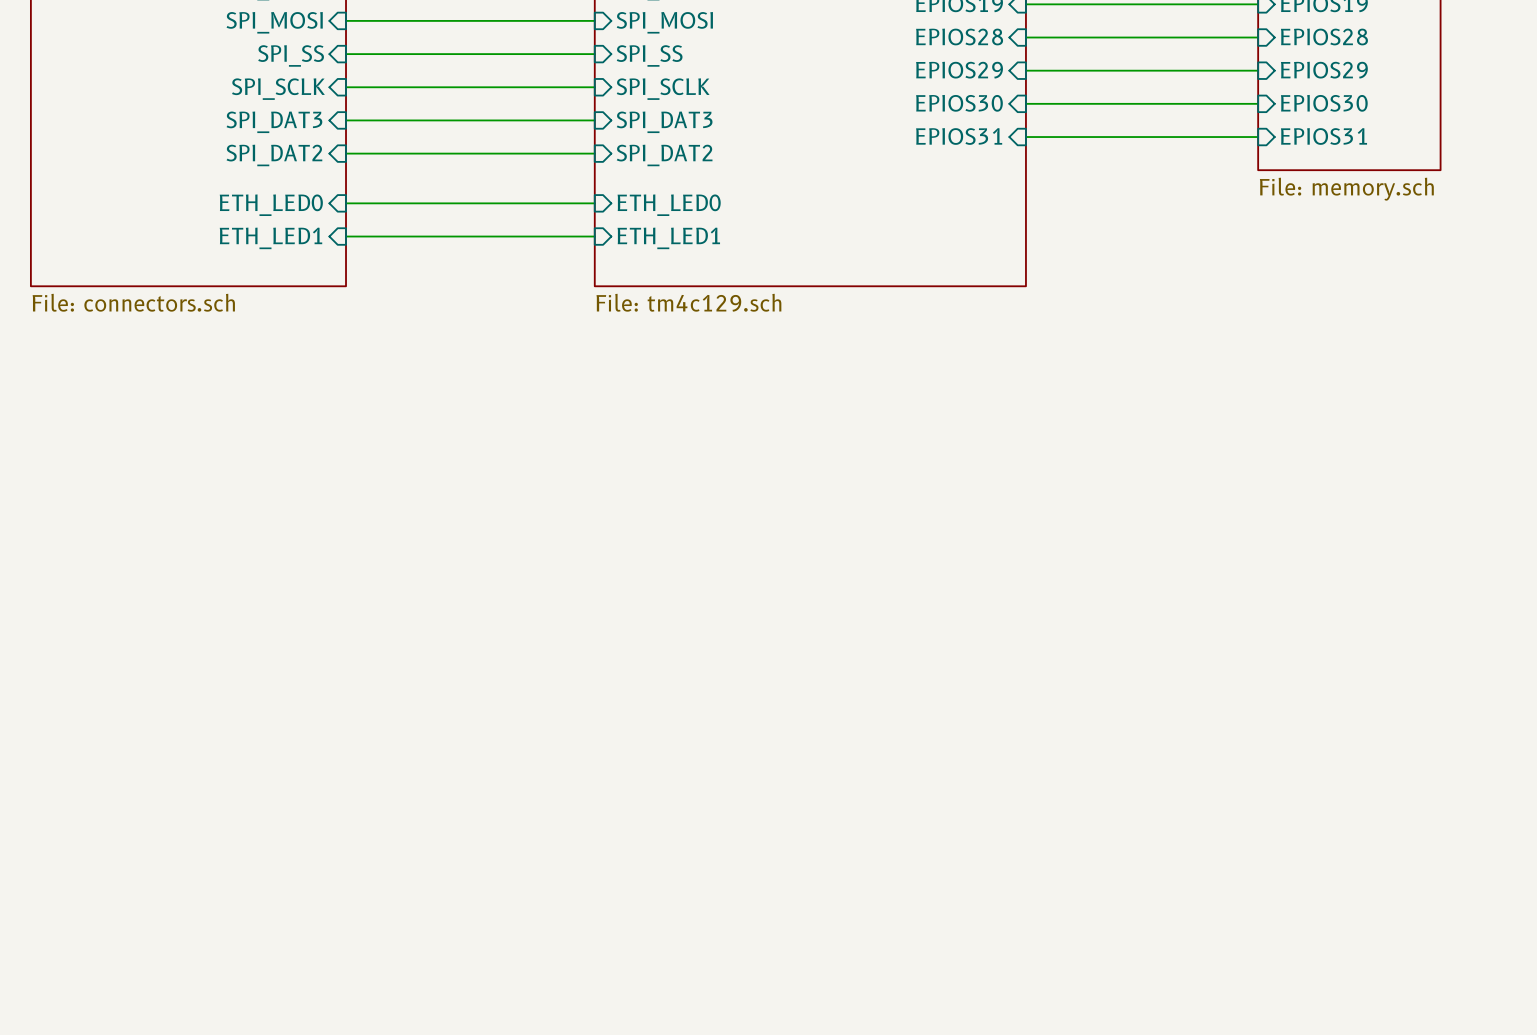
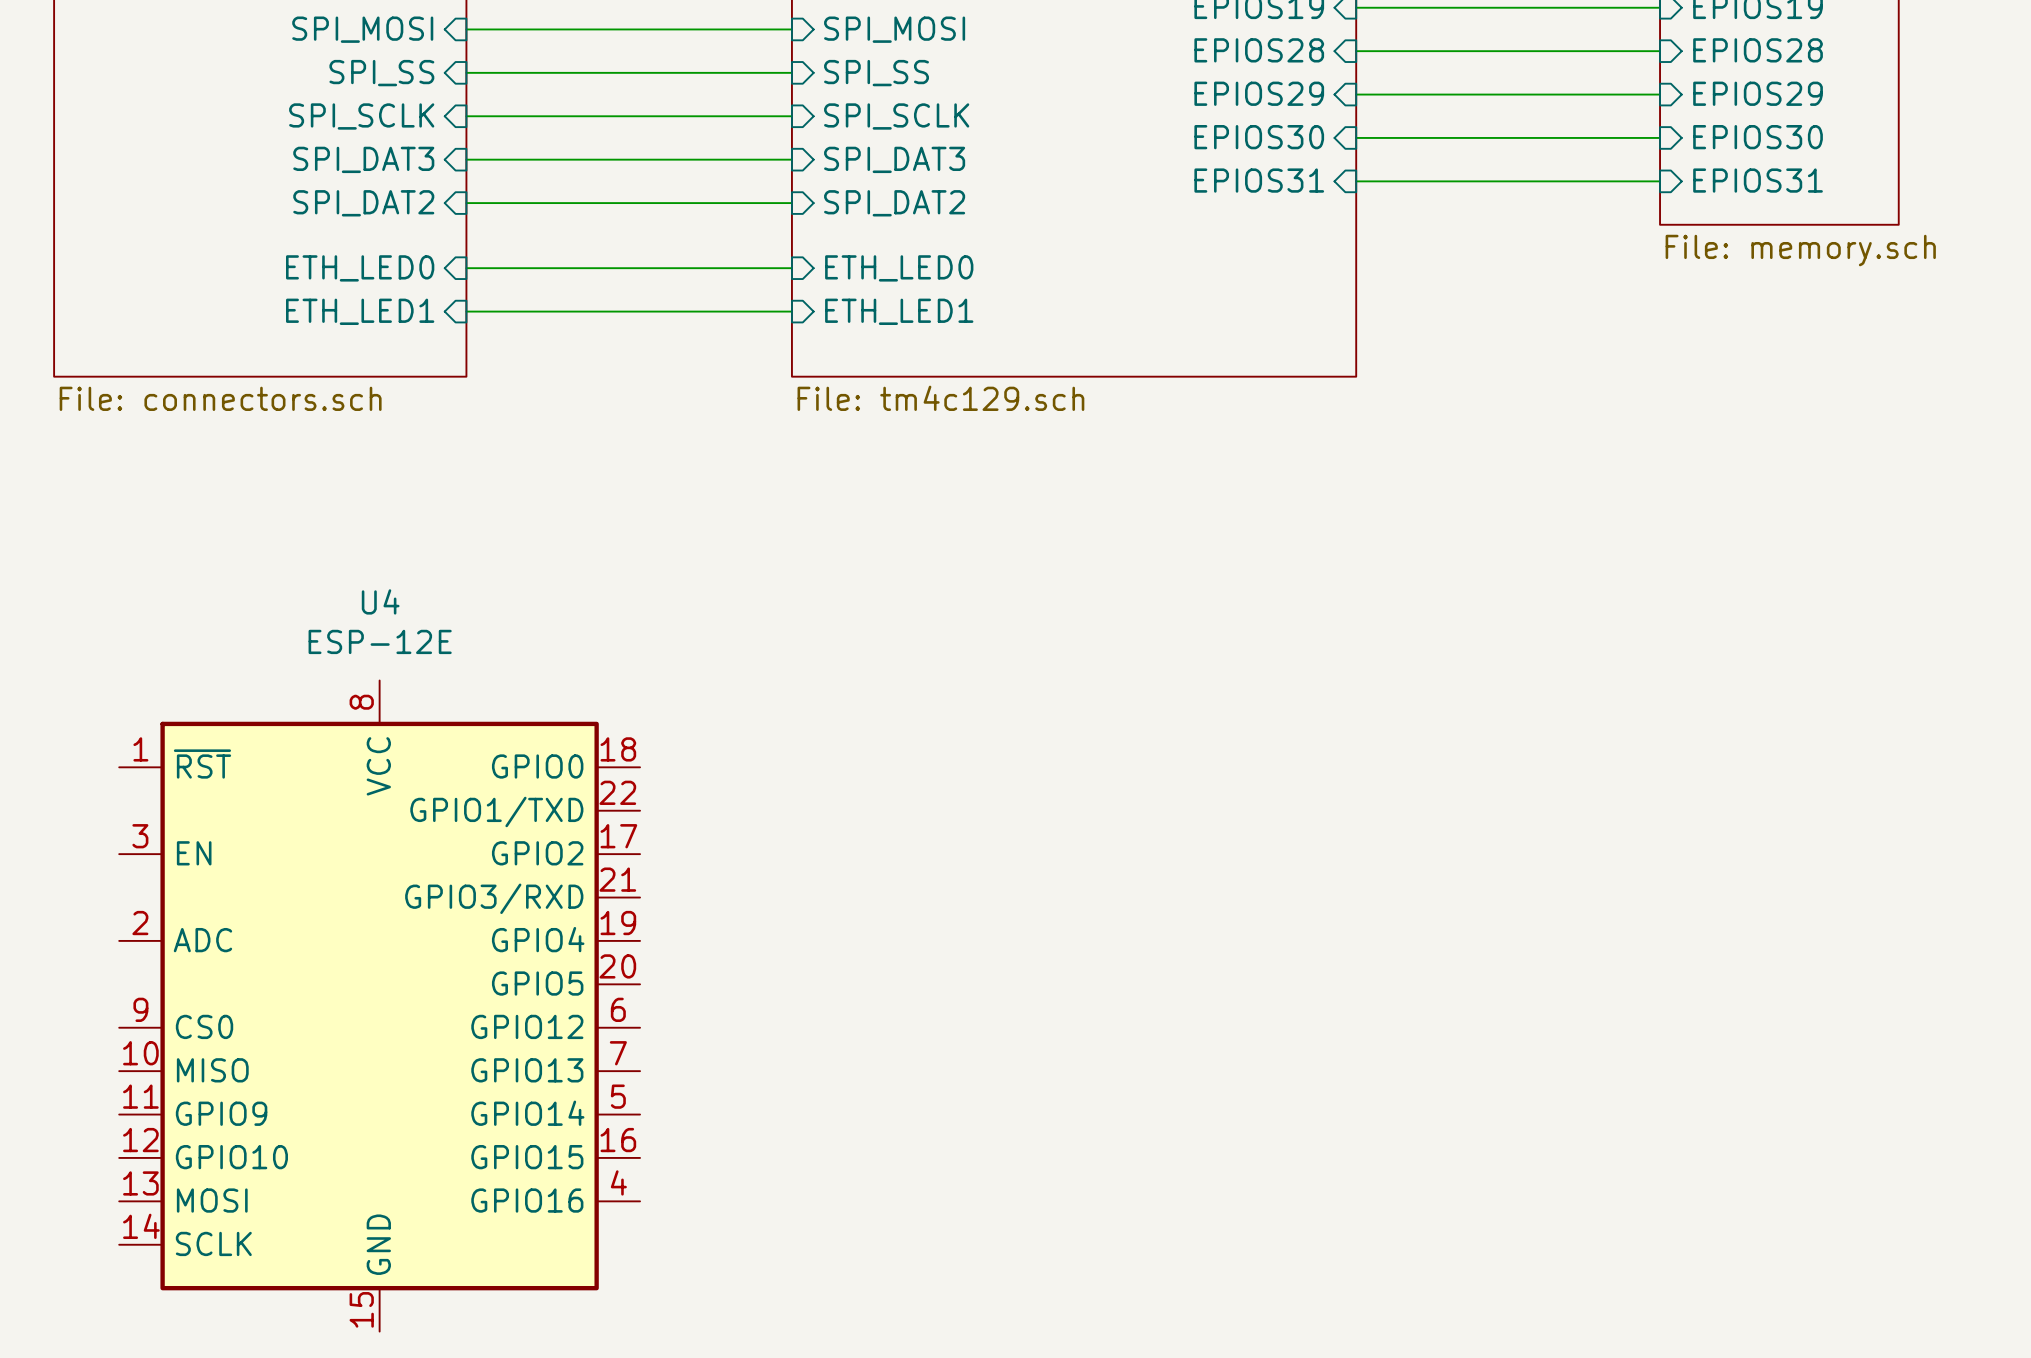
U4: none -> ESP-12E (379, 1006)

